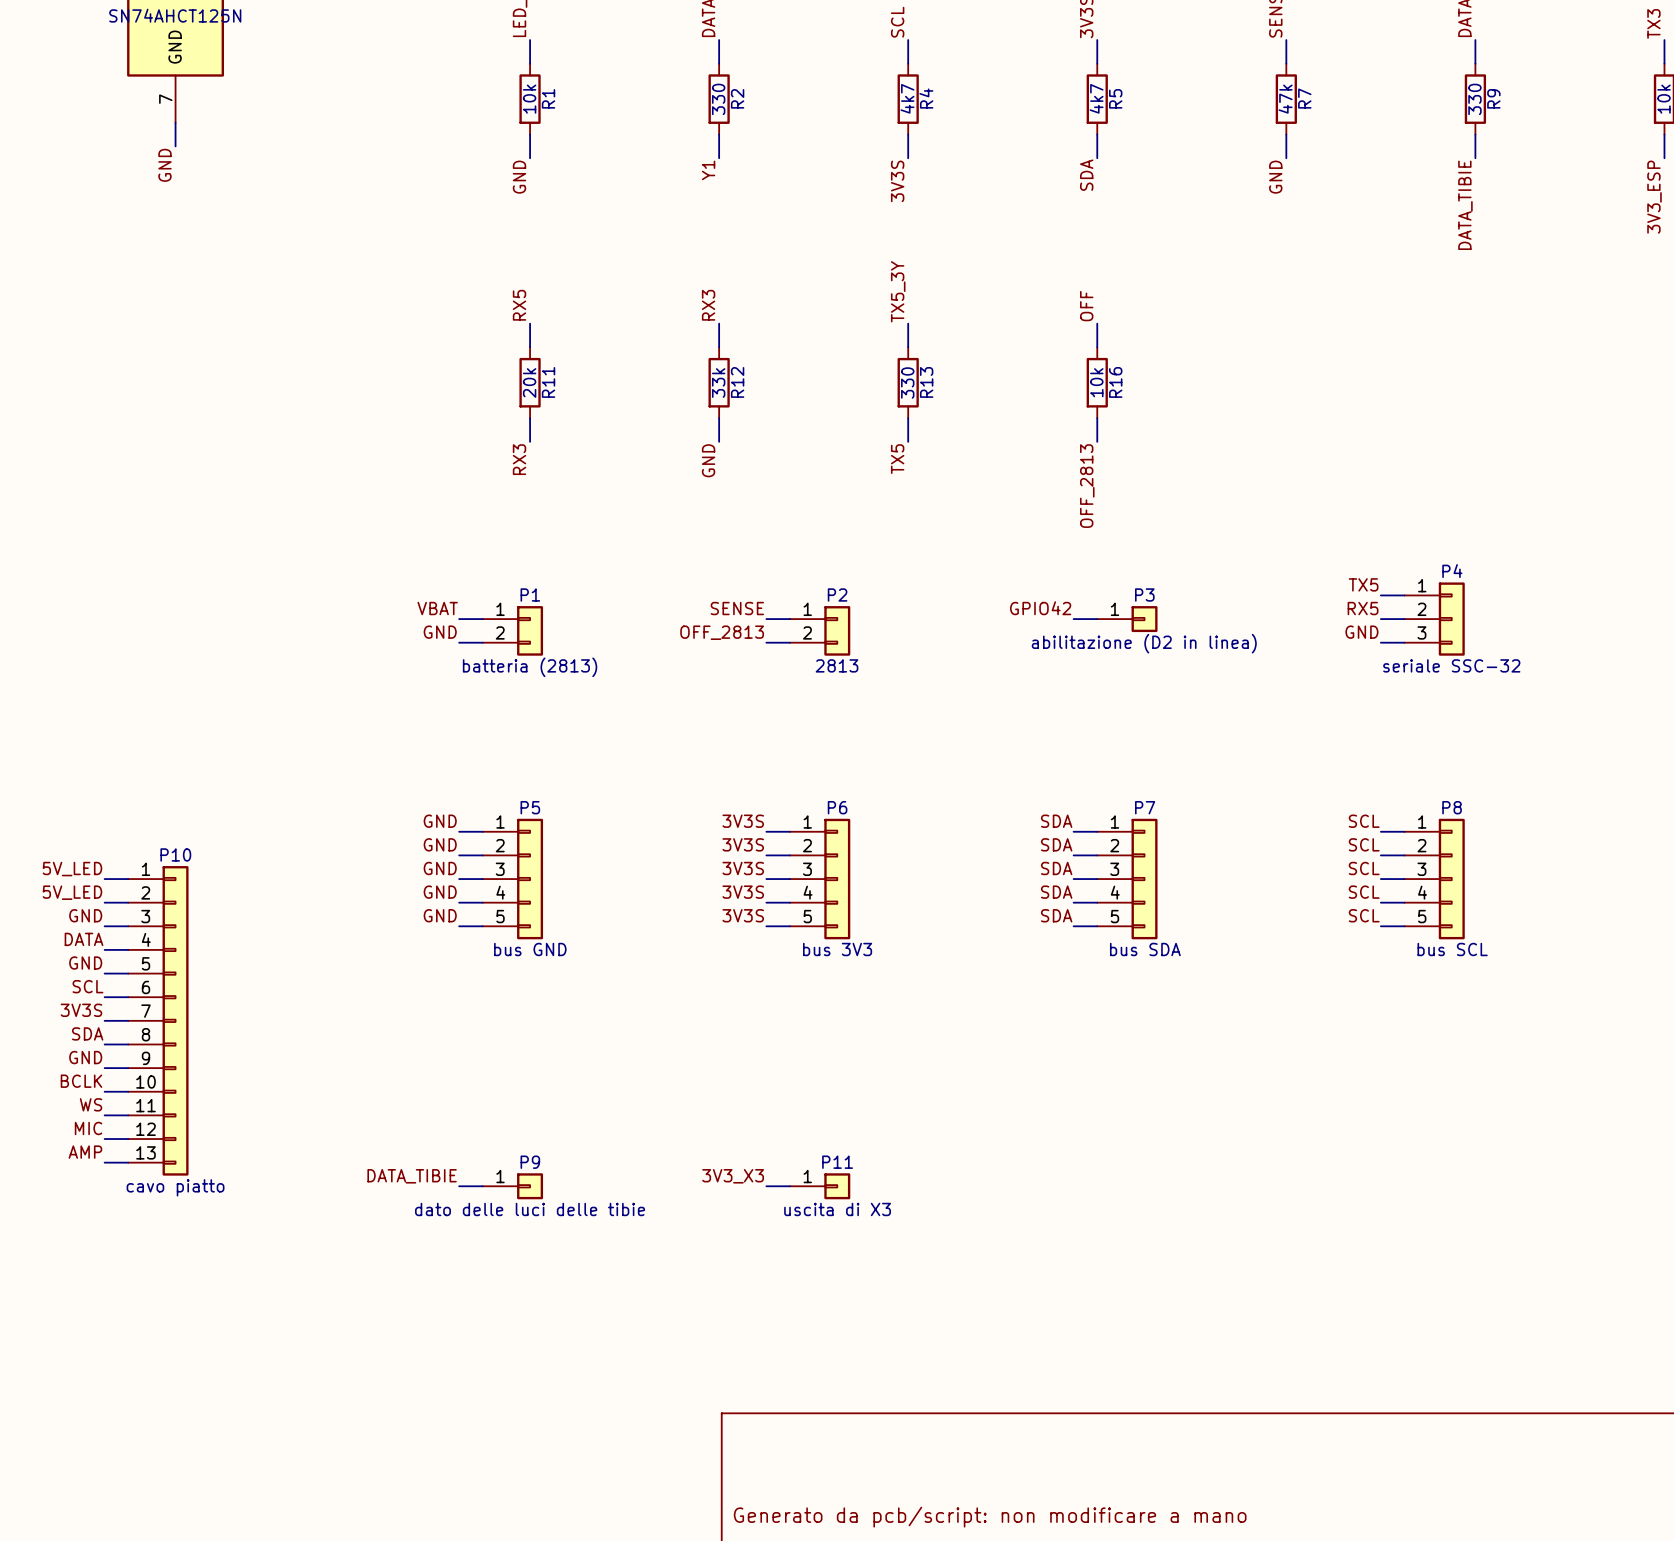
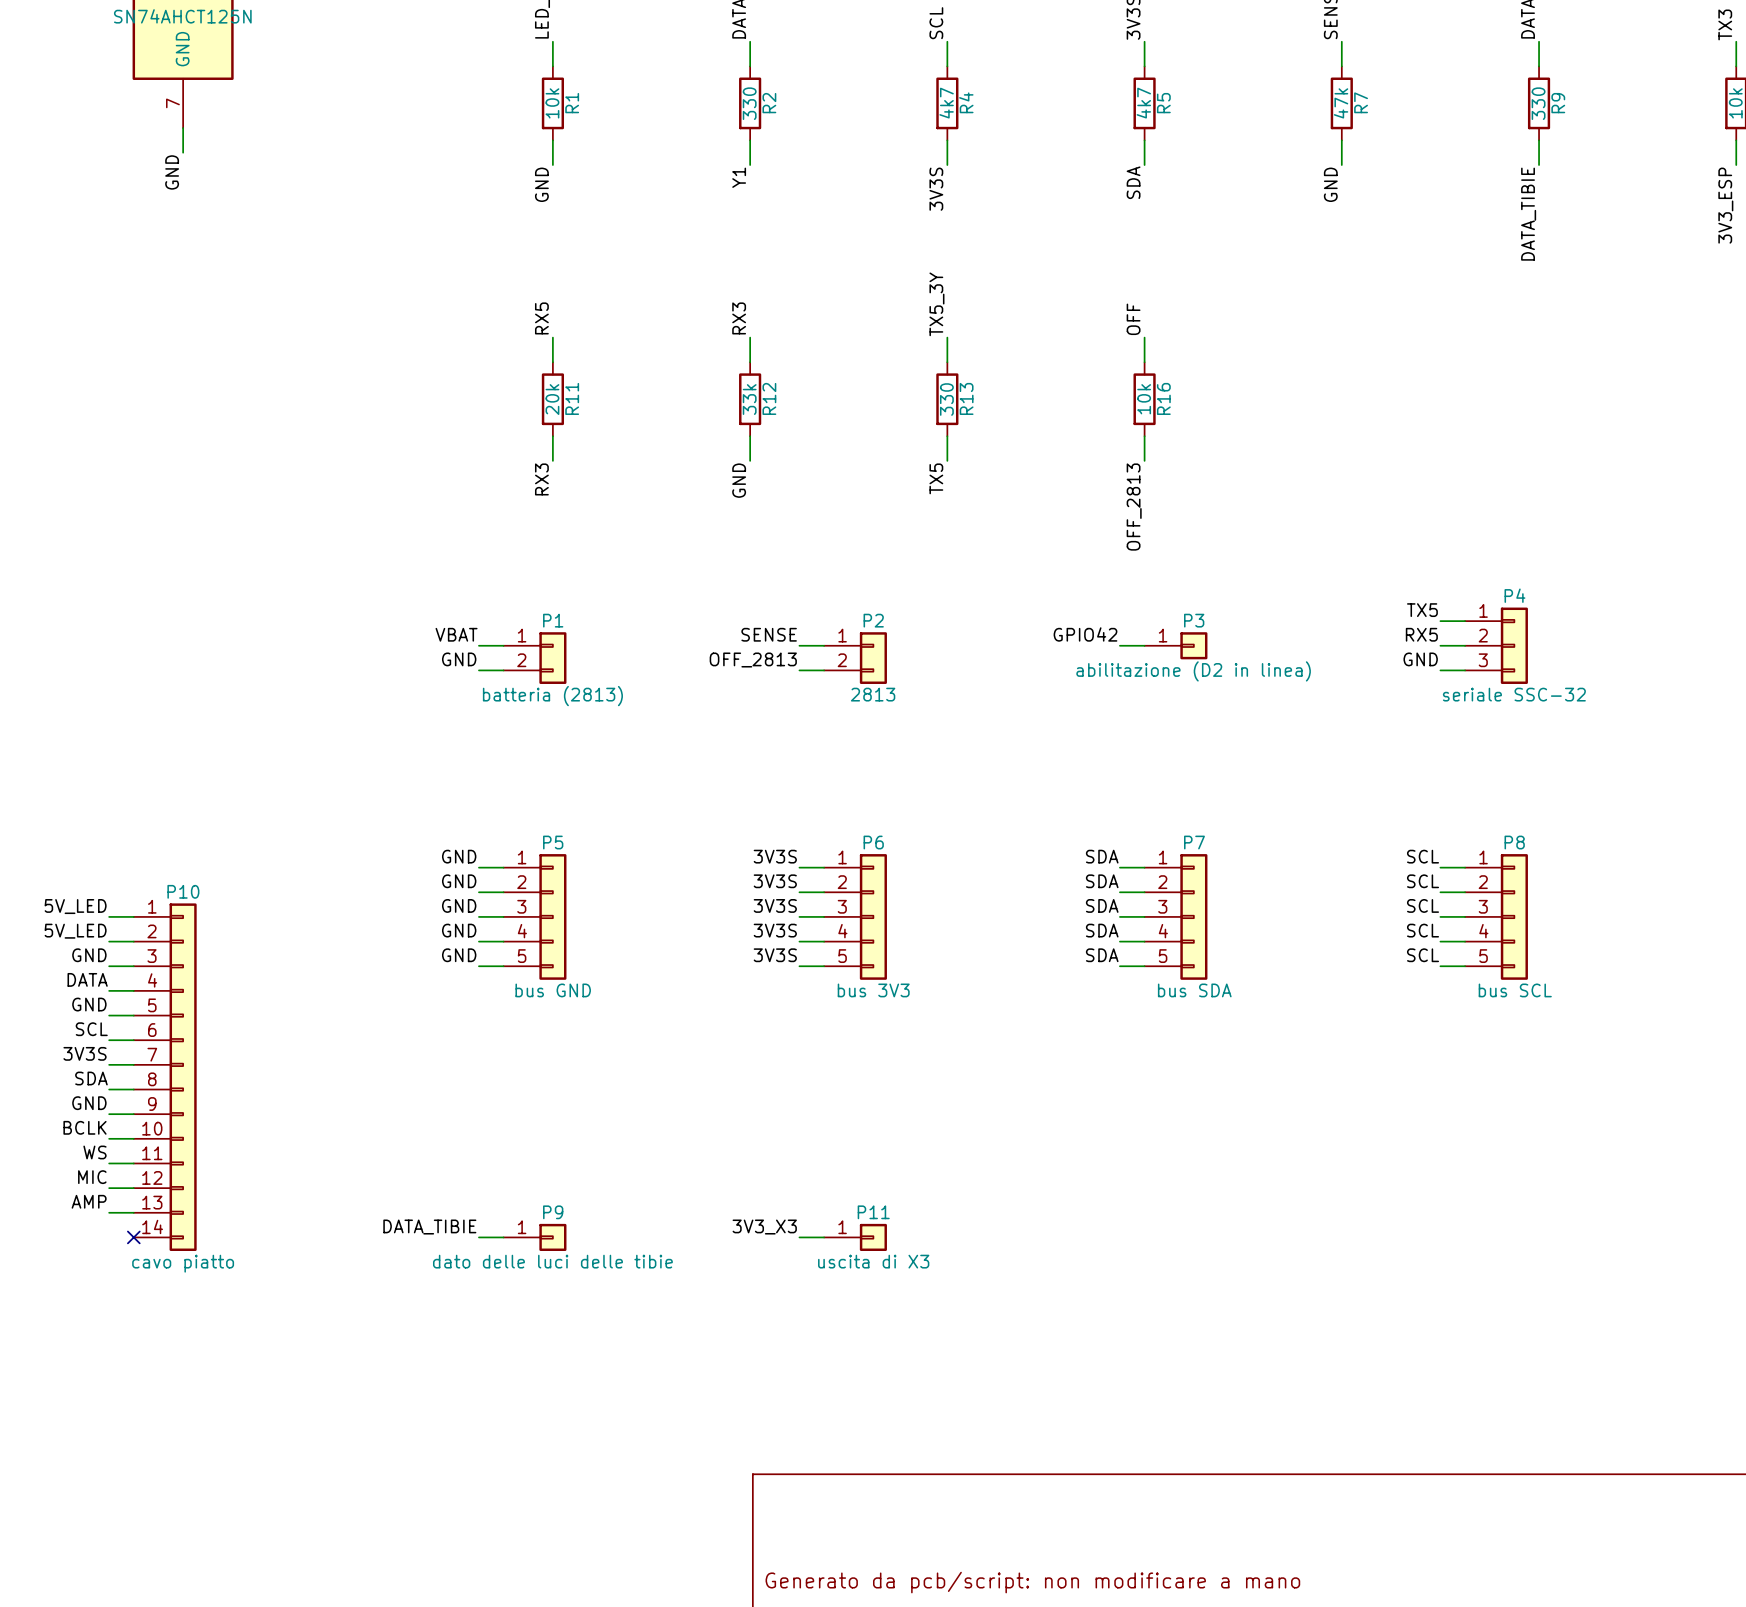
P10 symbol: [128, 866, 189, 1176] -> [133, 903, 197, 1252]
no-connect mark: none -> (133, 1237)

